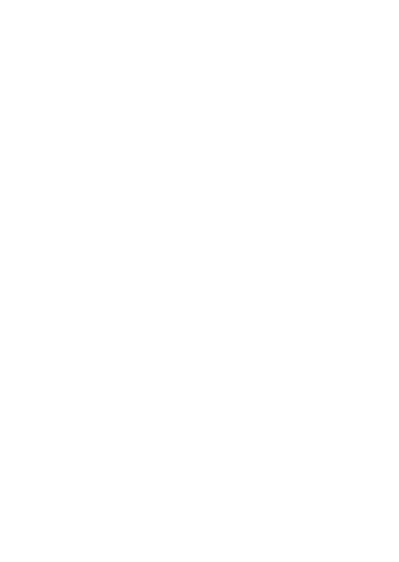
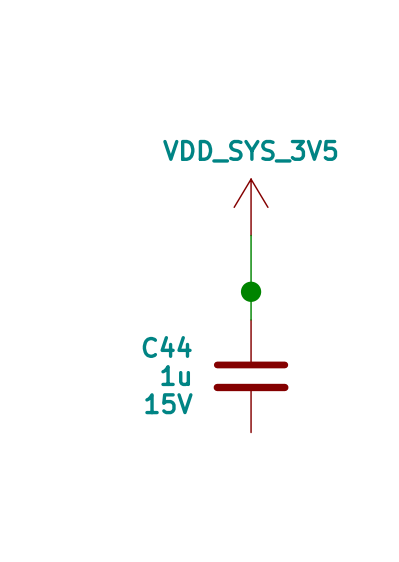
power symbol: none -> VDD_SYS_3V5 (251, 207)
wire: none -> (251, 235) (251, 319)
junction: none -> (251, 291)
C44: none -> 1u (251, 376)

